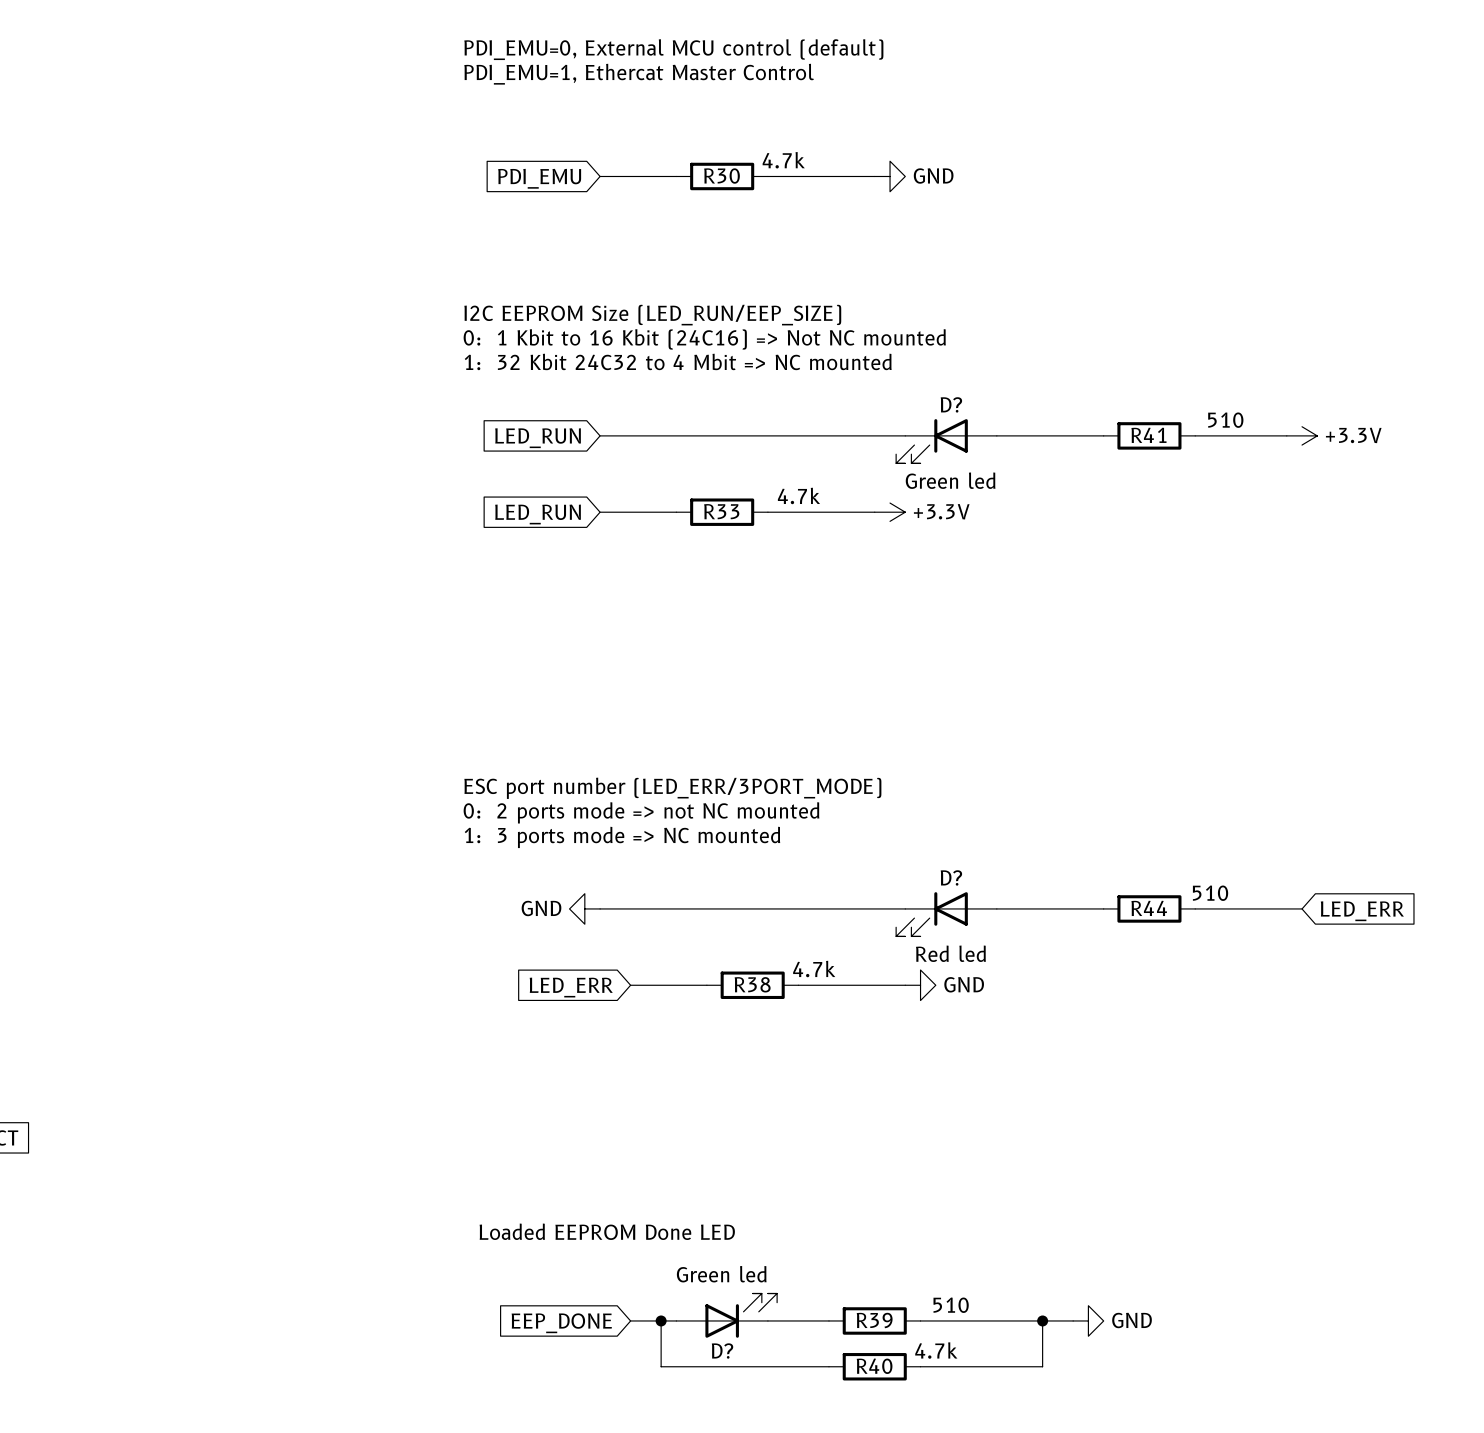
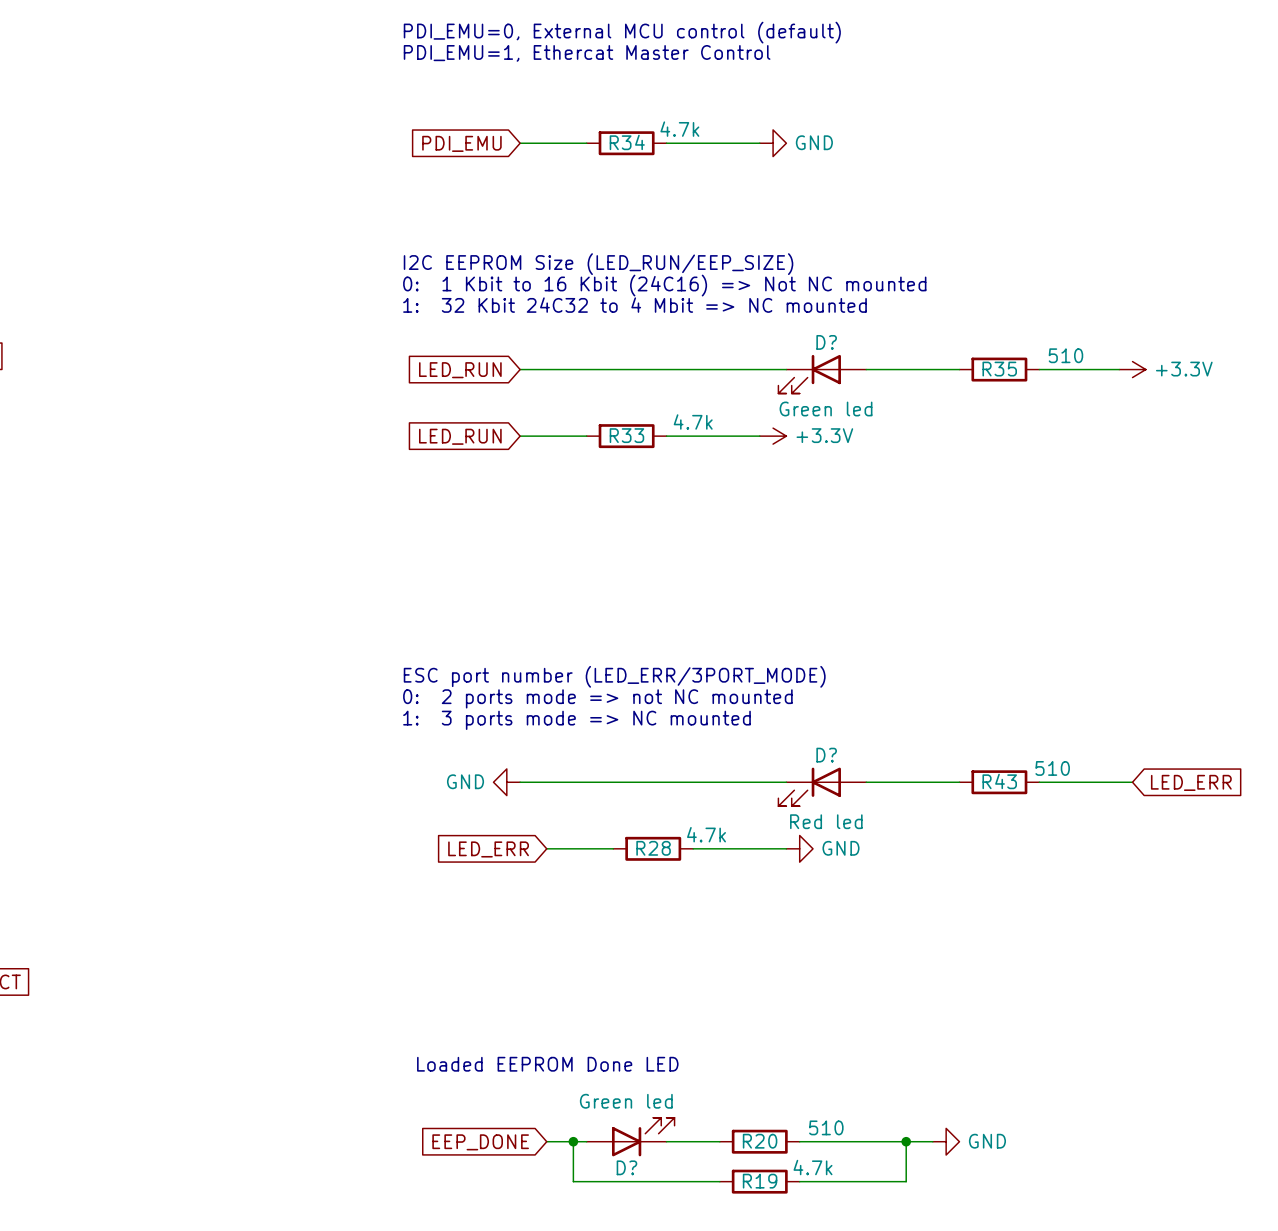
R30 name: R30 (721, 176) -> R34 (627, 142)
R41 name: R41 (1148, 435) -> R35 (999, 369)
R44 name: R44 (1149, 908) -> R43 (999, 781)
R38 name: R38 (752, 984) -> R28 (653, 848)
R39 name: R39 (874, 1320) -> R20 (760, 1141)
R40 name: R40 (874, 1366) -> R19 (760, 1181)

